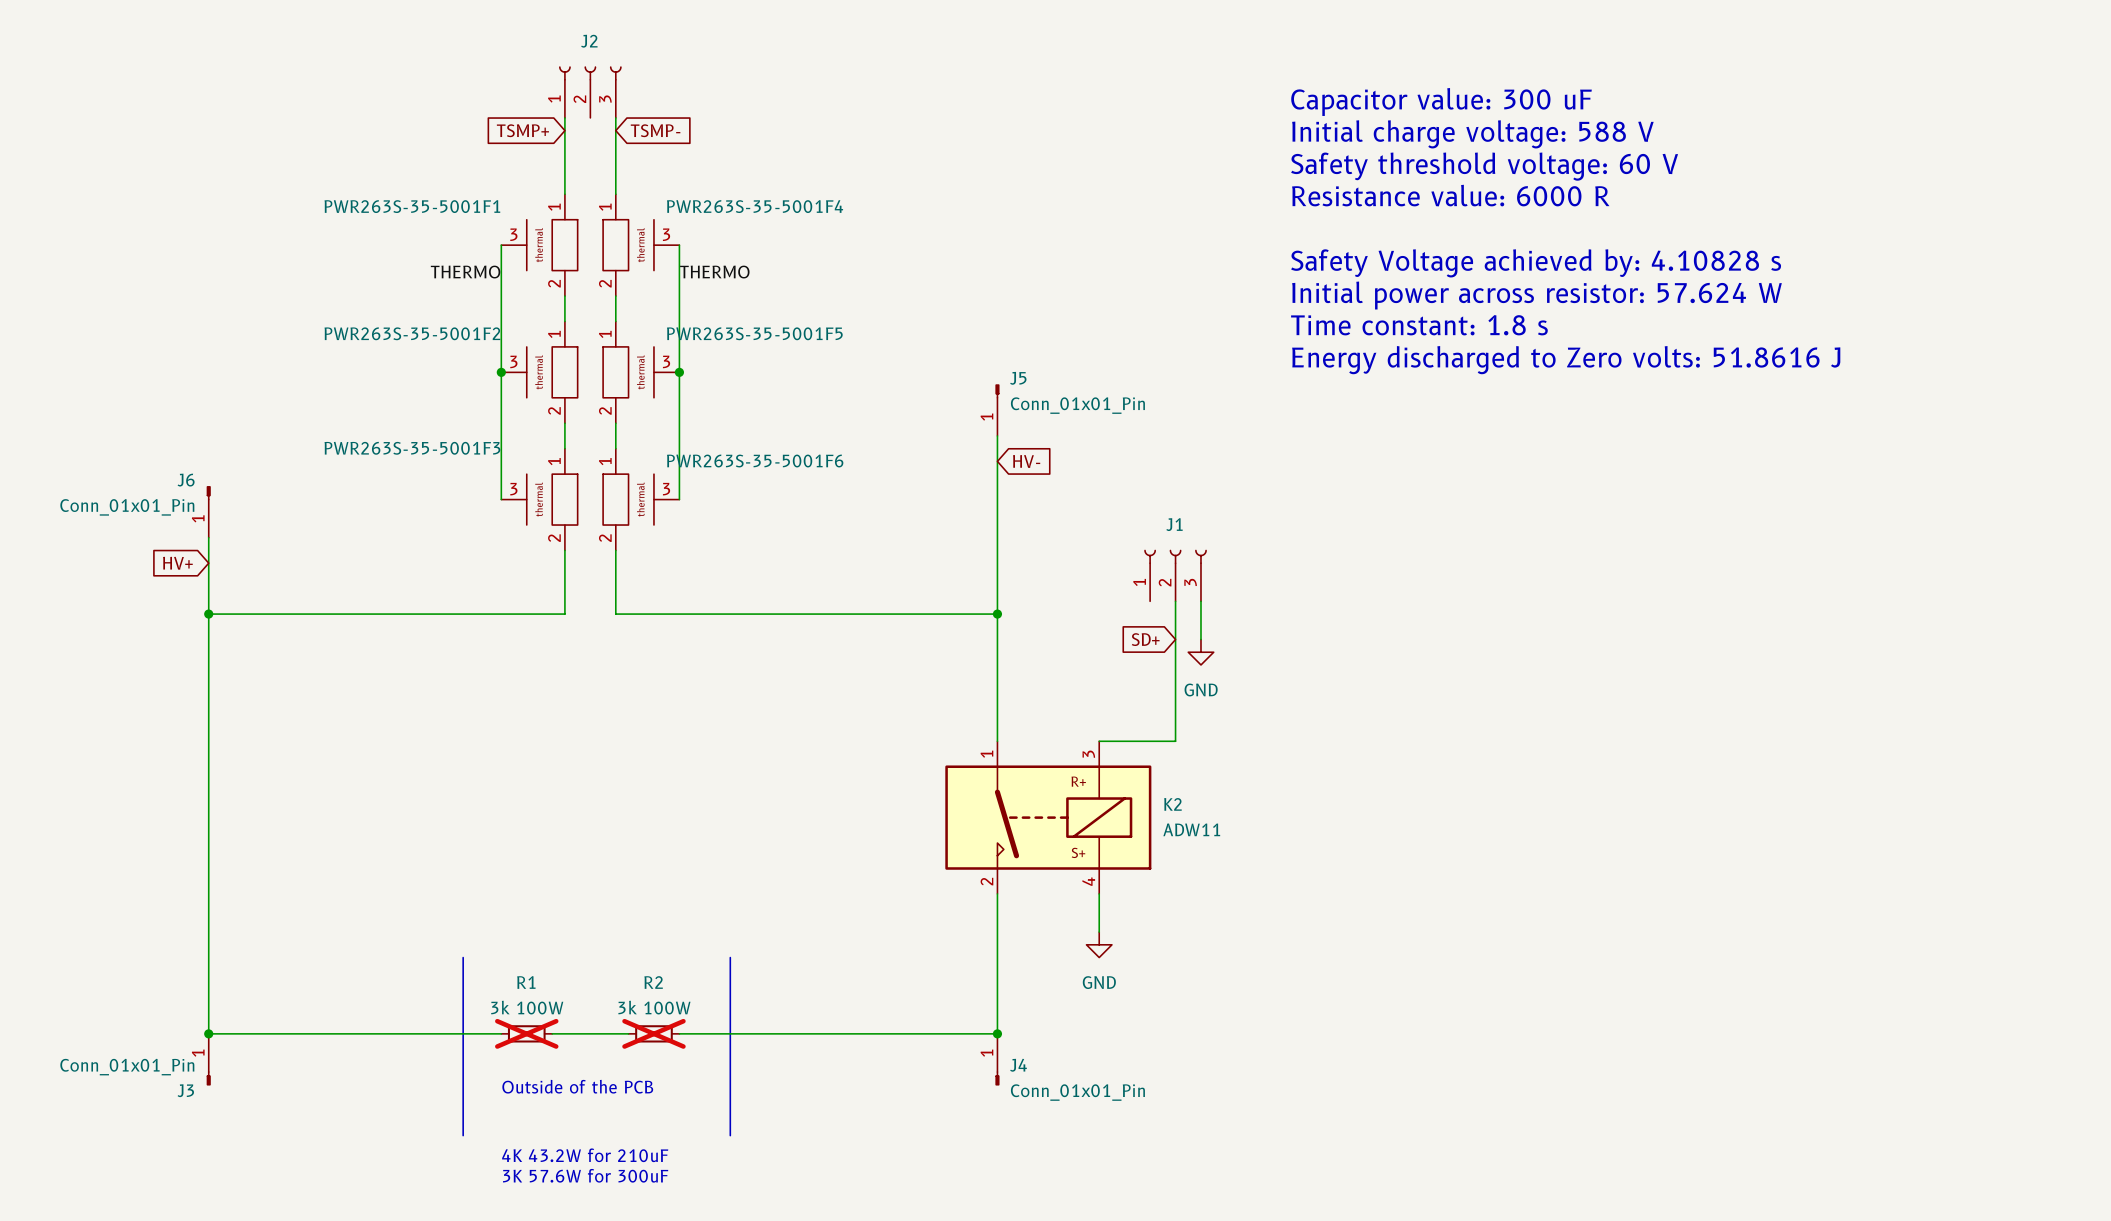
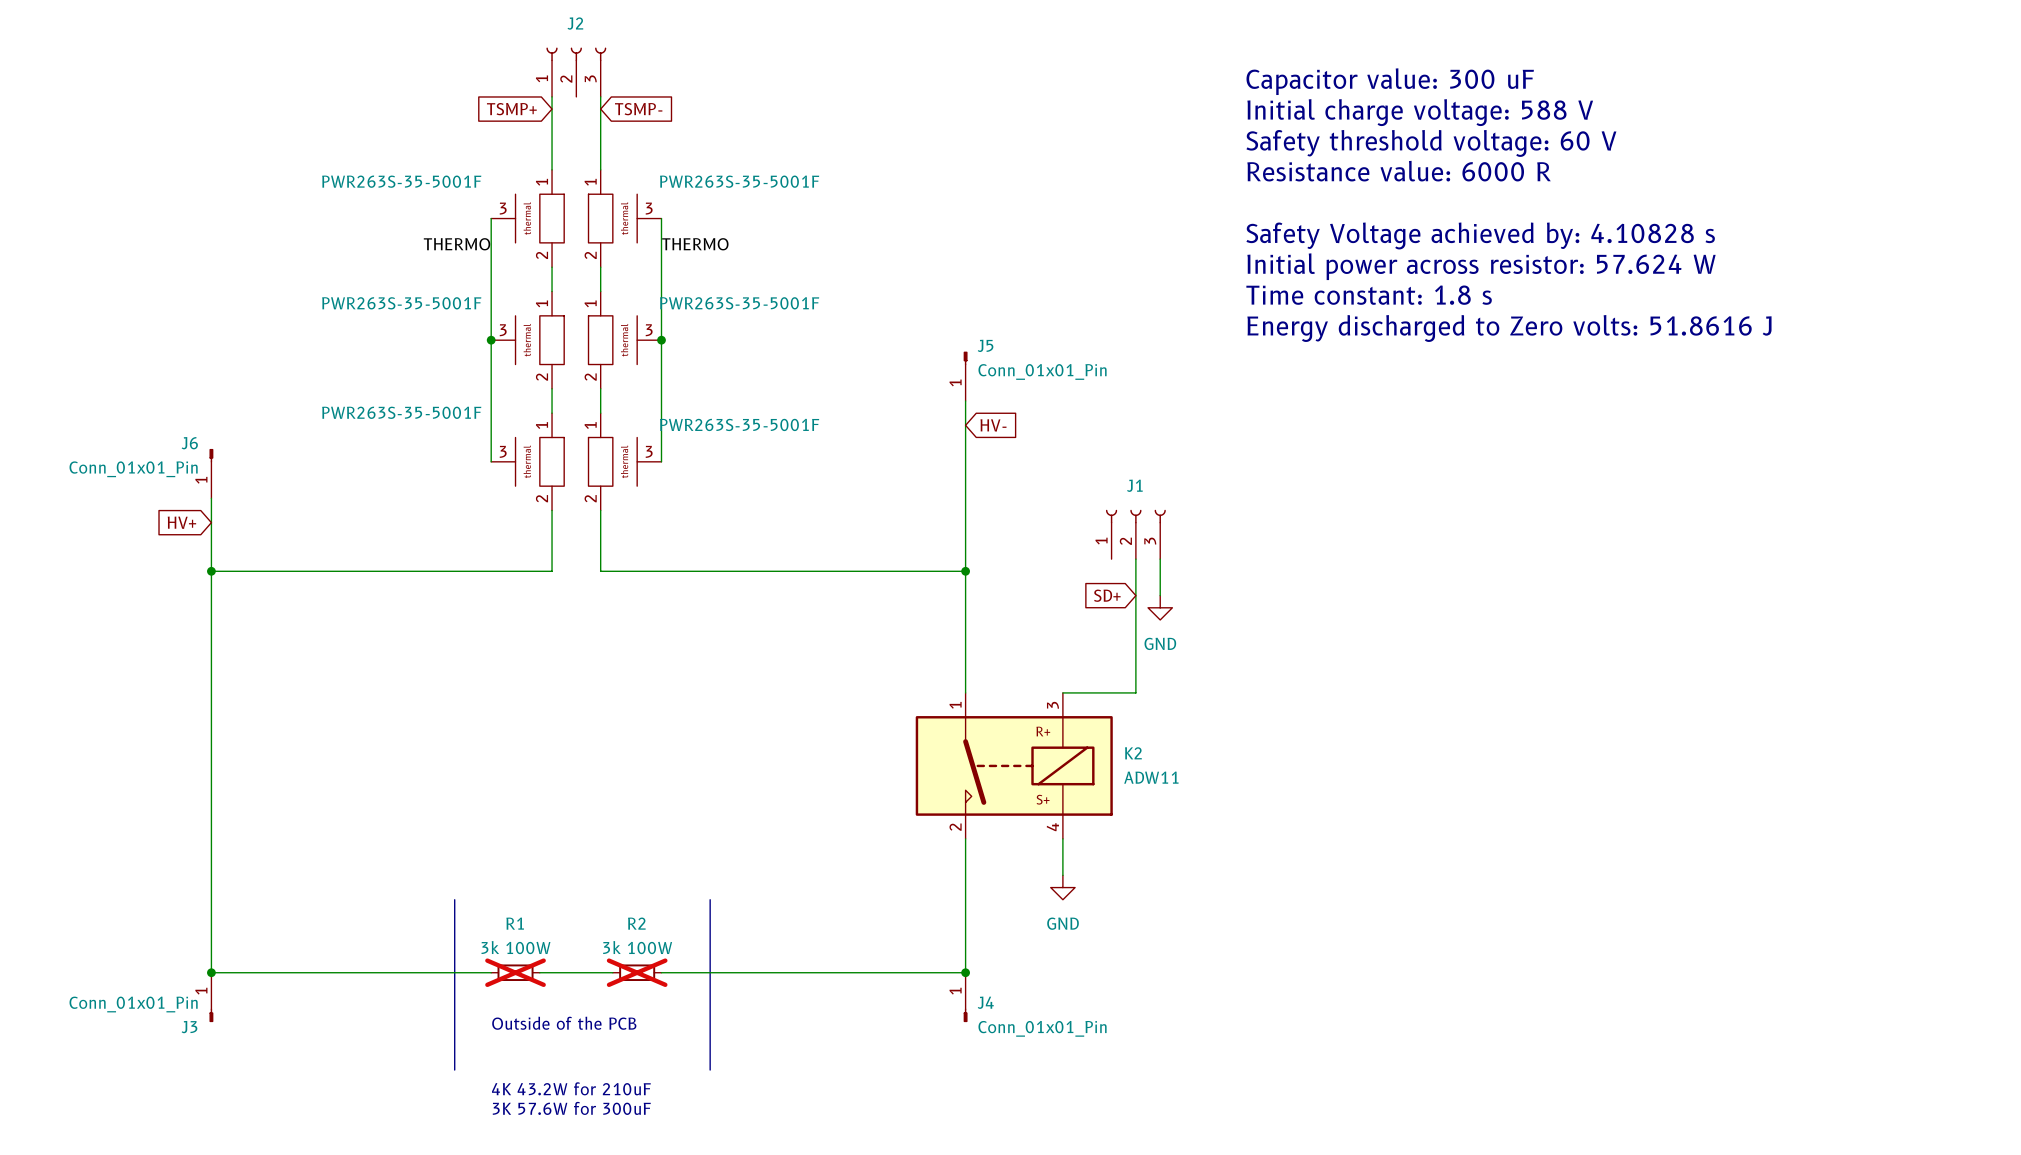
PWR263S-35-5001F1 name: PWR263S-35-5001F1 (412, 206) -> PWR263S-35-5001F (401, 181)
PWR263S-35-5001F4 name: PWR263S-35-5001F4 (755, 206) -> PWR263S-35-5001F (739, 181)
PWR263S-35-5001F2 name: PWR263S-35-5001F2 (412, 333) -> PWR263S-35-5001F (401, 303)
PWR263S-35-5001F5 name: PWR263S-35-5001F5 (754, 333) -> PWR263S-35-5001F (739, 303)
PWR263S-35-5001F3 name: PWR263S-35-5001F3 (412, 448) -> PWR263S-35-5001F (401, 412)
PWR263S-35-5001F6 name: PWR263S-35-5001F6 (755, 461) -> PWR263S-35-5001F (739, 424)

